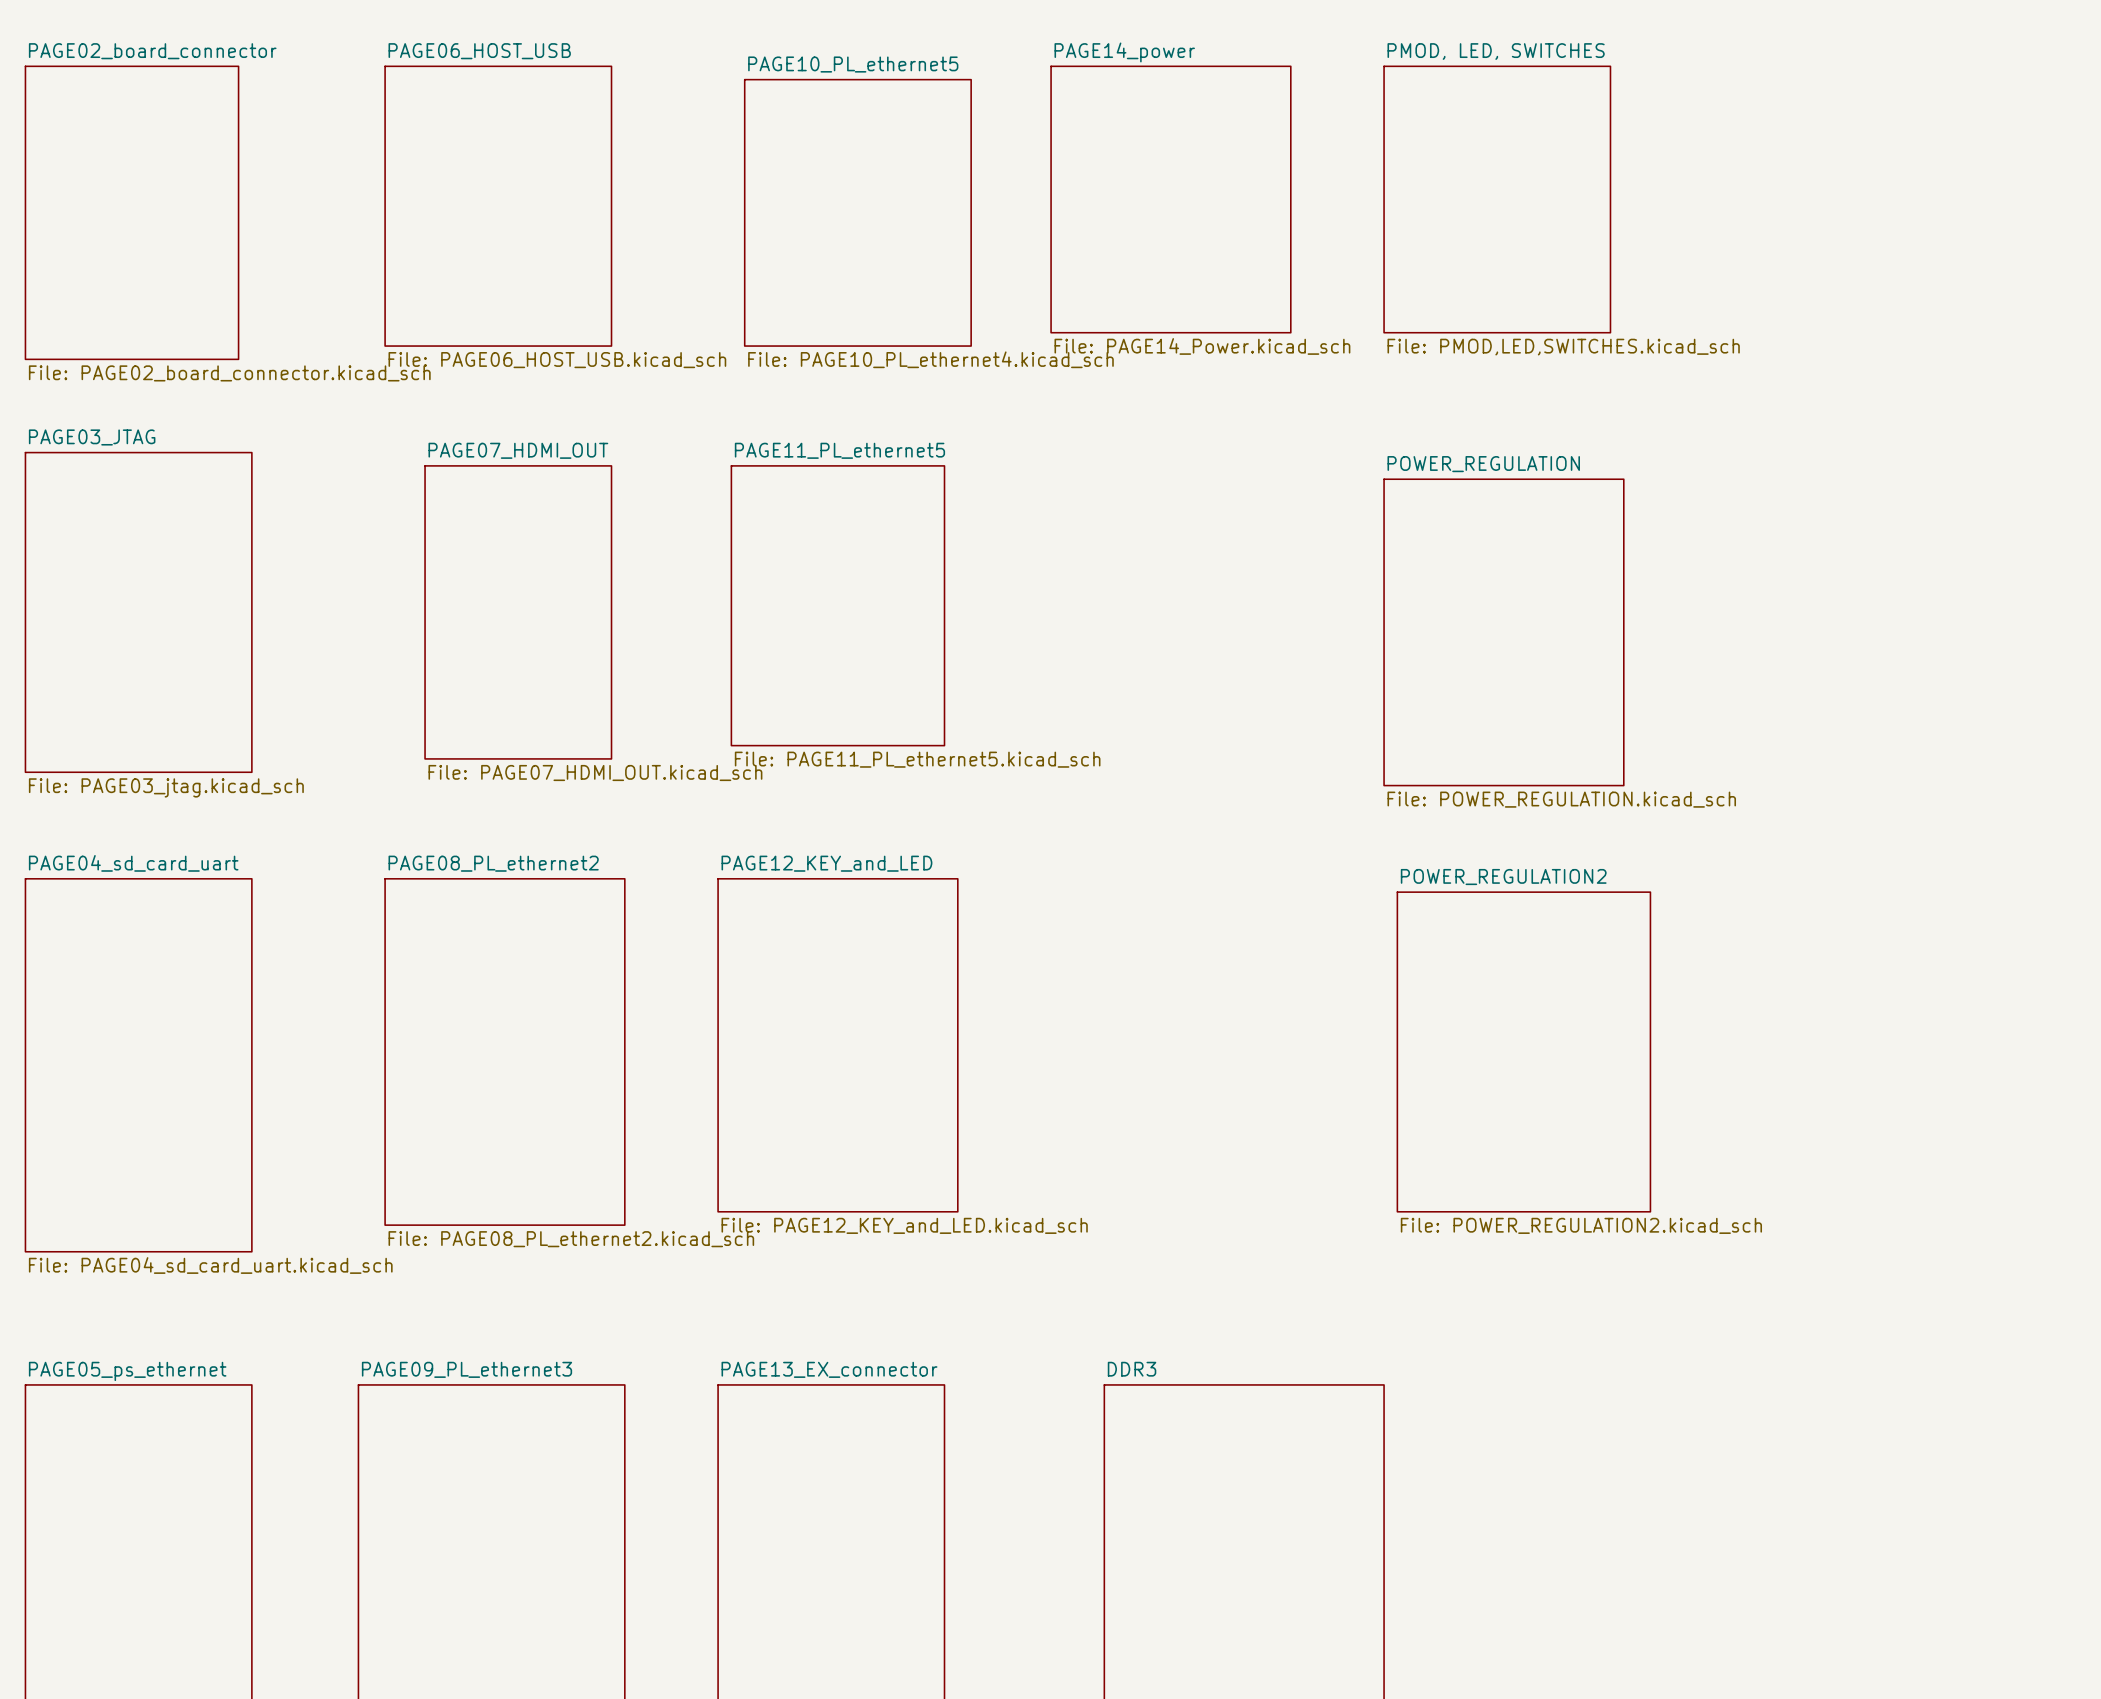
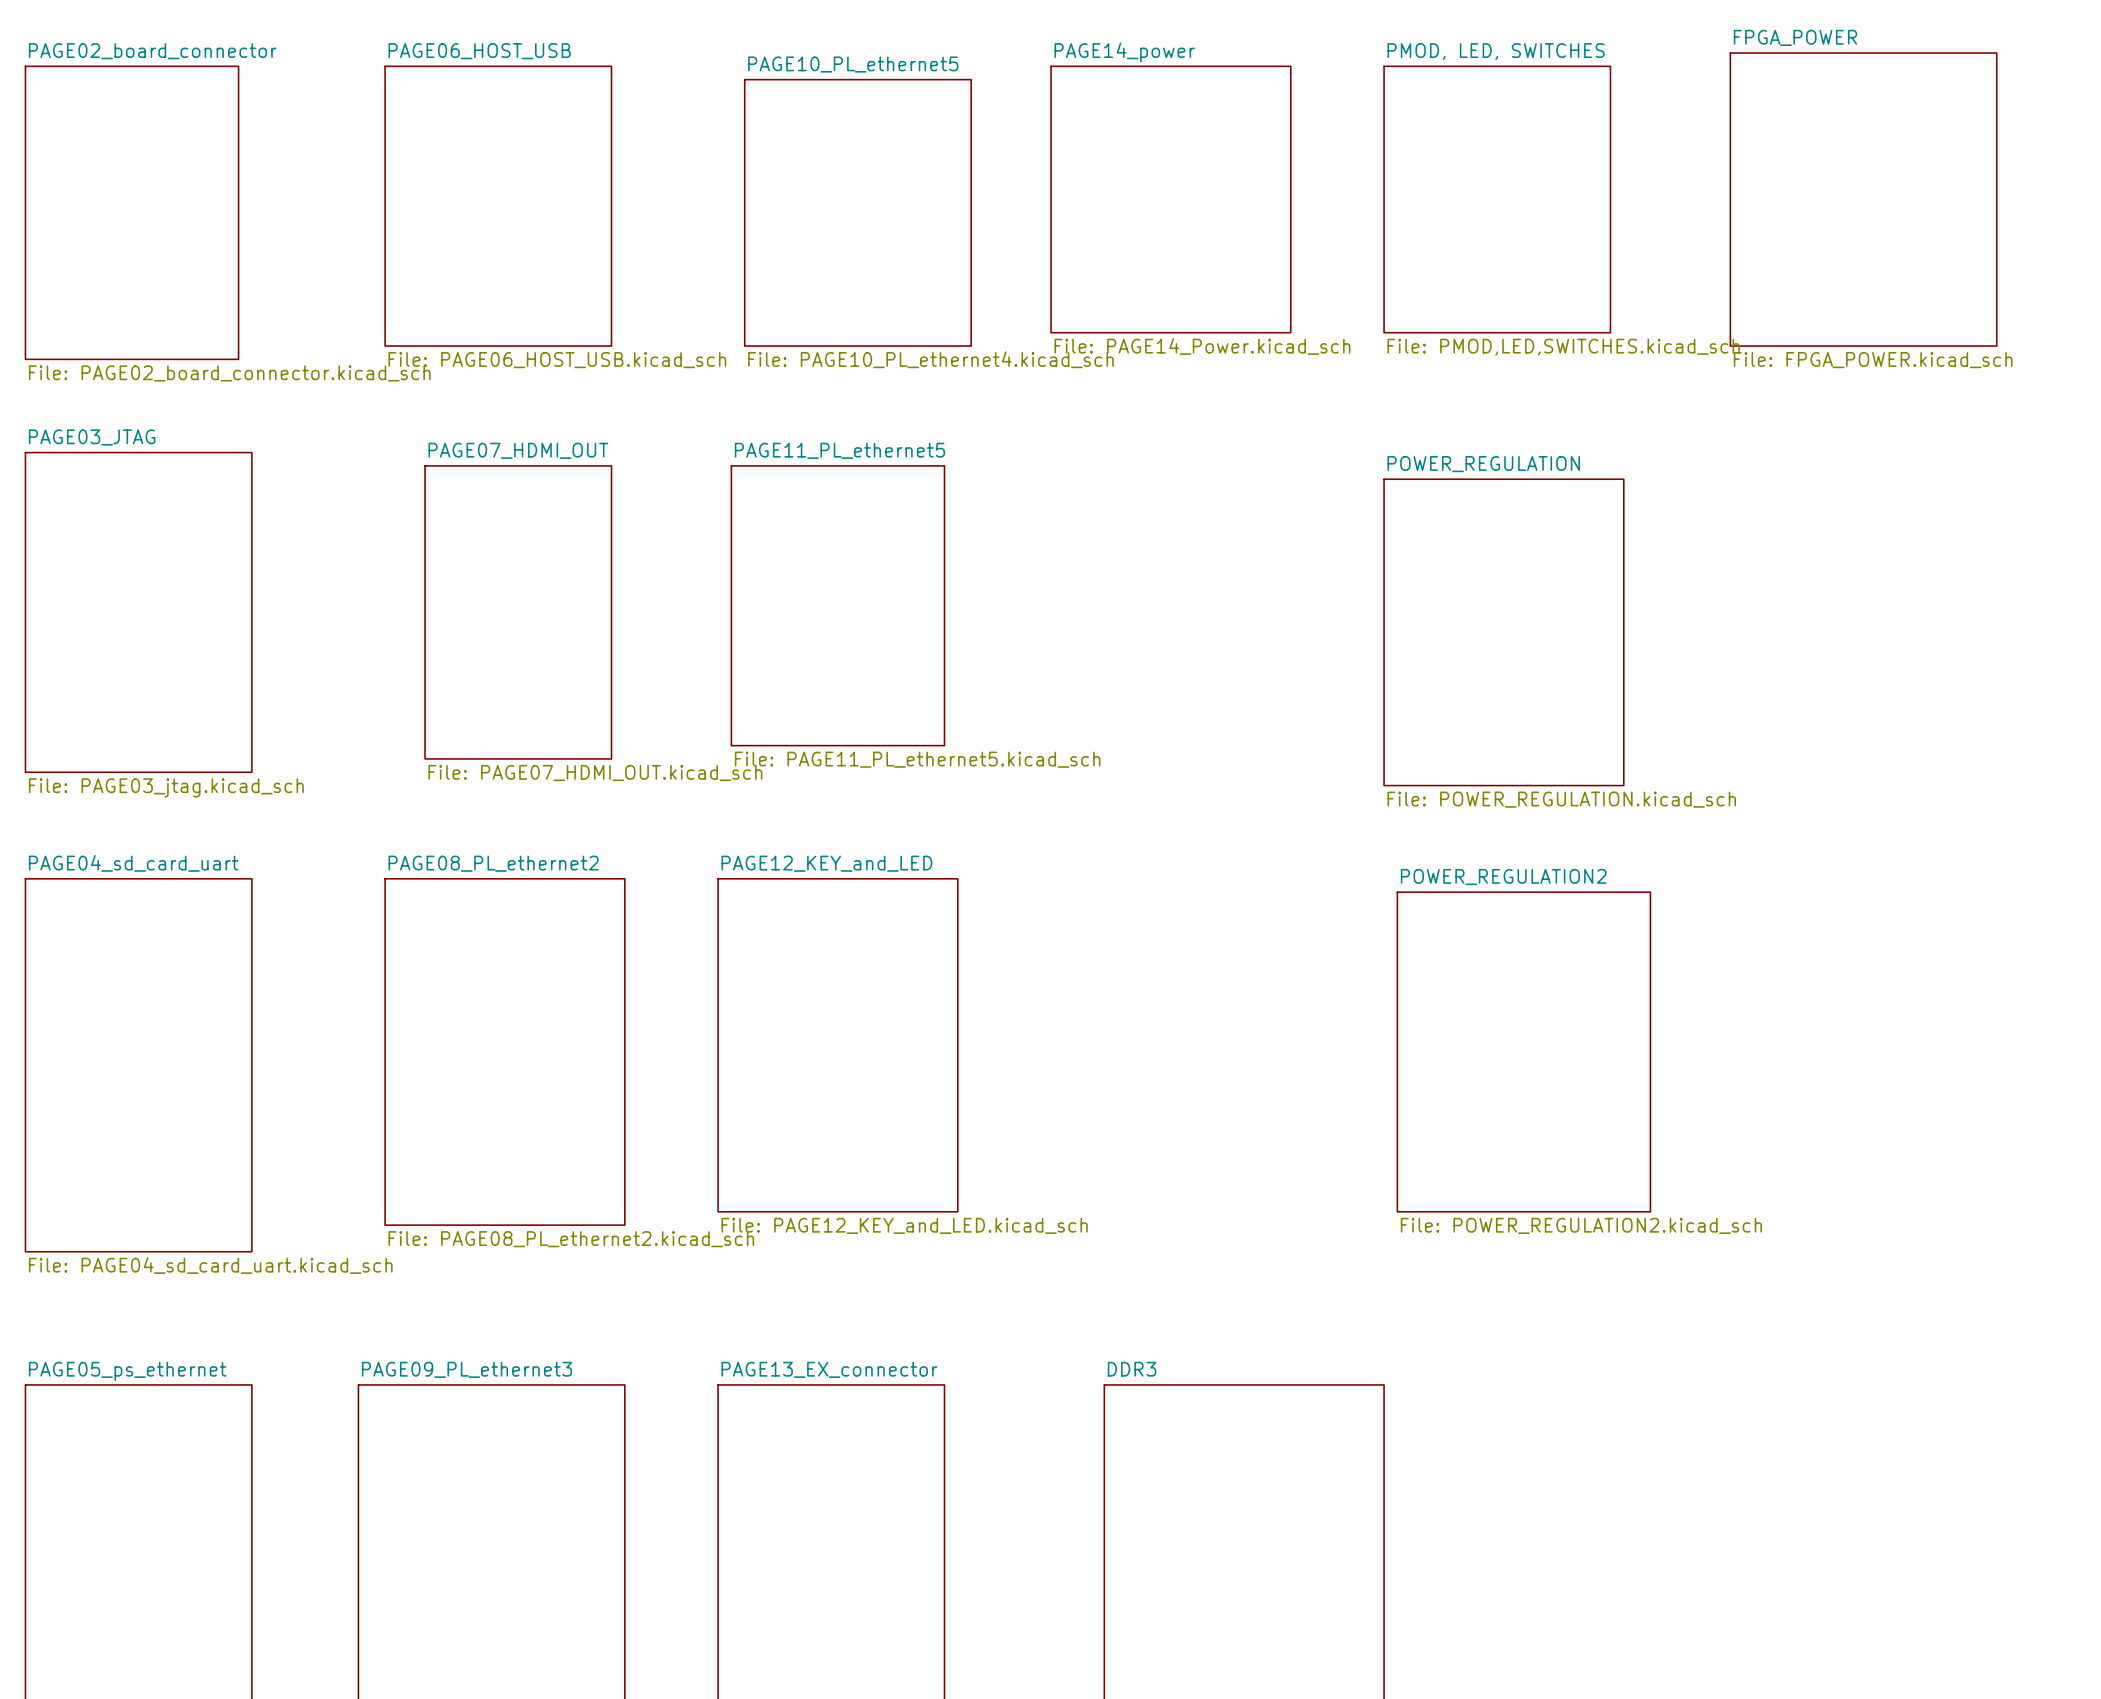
sheet FPGA_POWER: none -> File: FPGA_POWER.kicad_sch (1863, 199)

